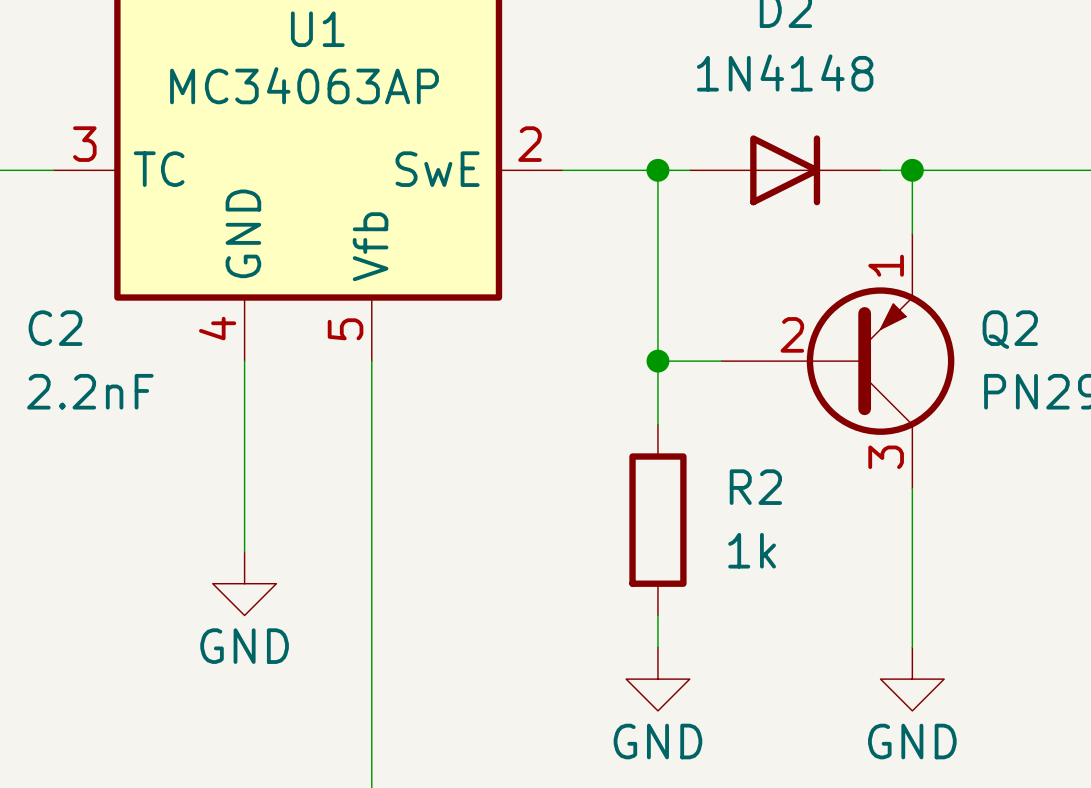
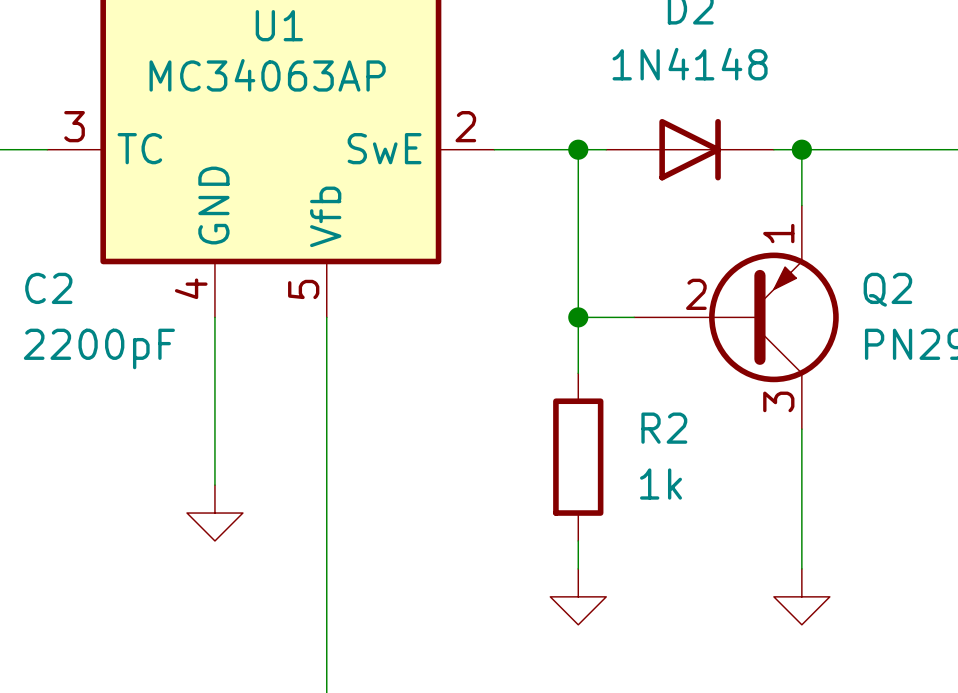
C2 value: 2.2nF (90, 391) -> 2200pF (99, 348)
power symbol text: GND (244, 646) -> none
power symbol text: GND (657, 741) -> none
power symbol text: GND (912, 741) -> none

